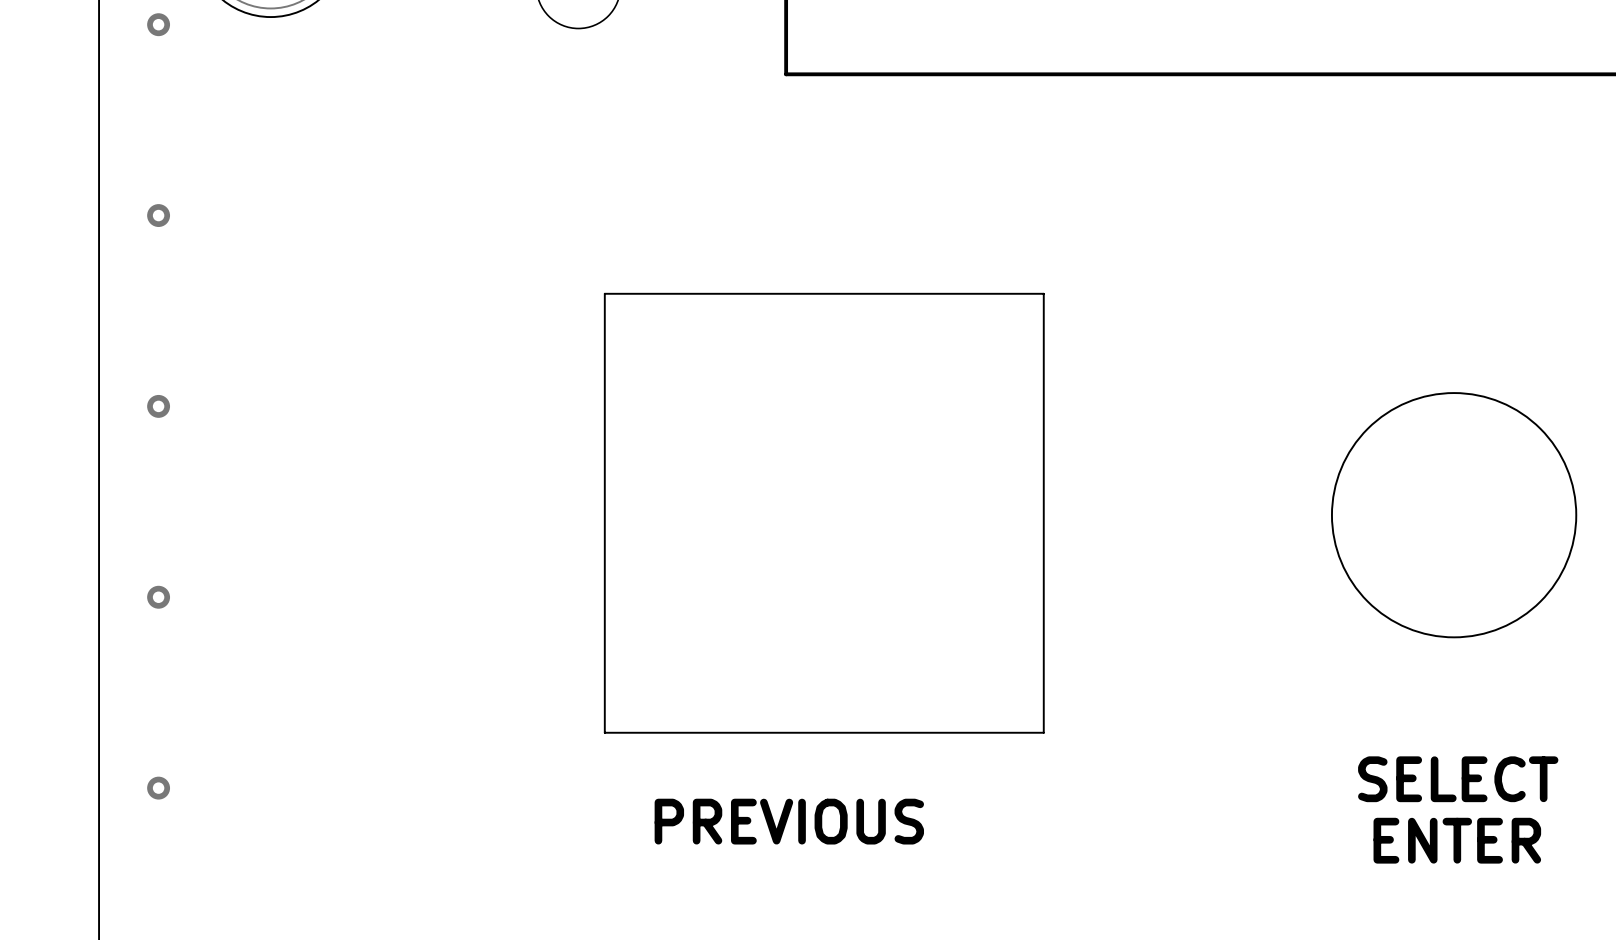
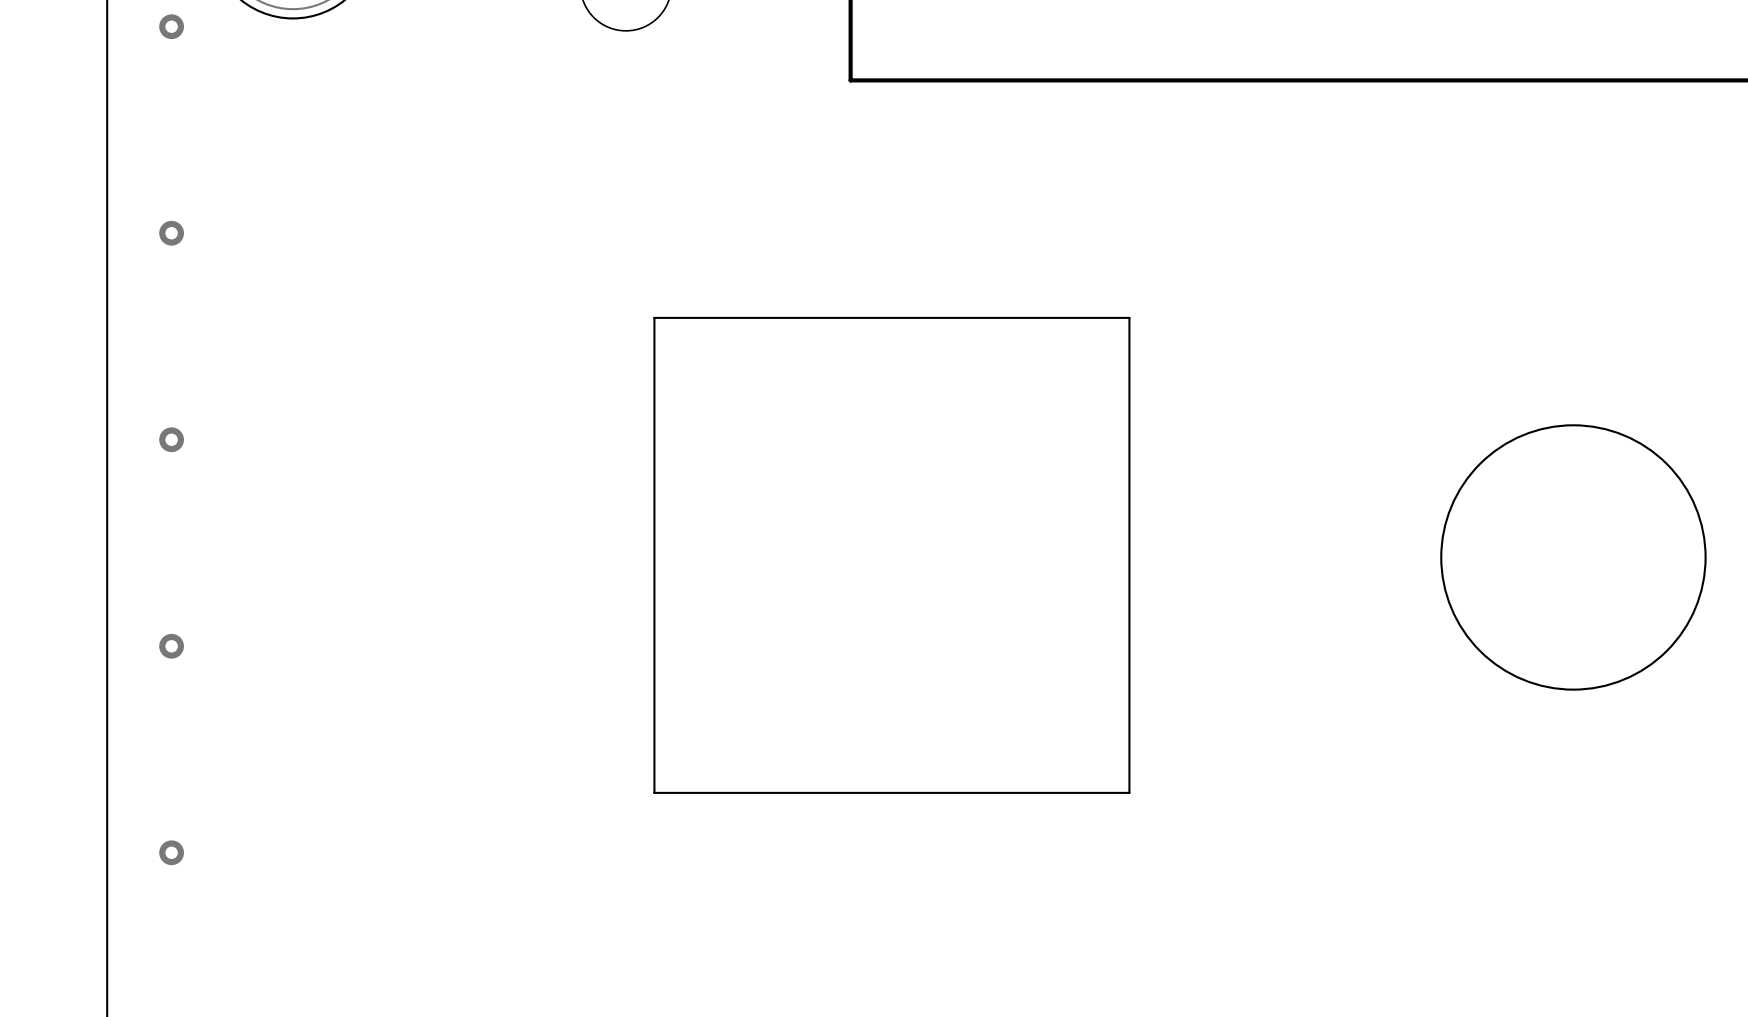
text: SELECT (1458, 779) -> none
text: PREVIOUS (789, 821) -> none
text: ENTER (1457, 840) -> none

